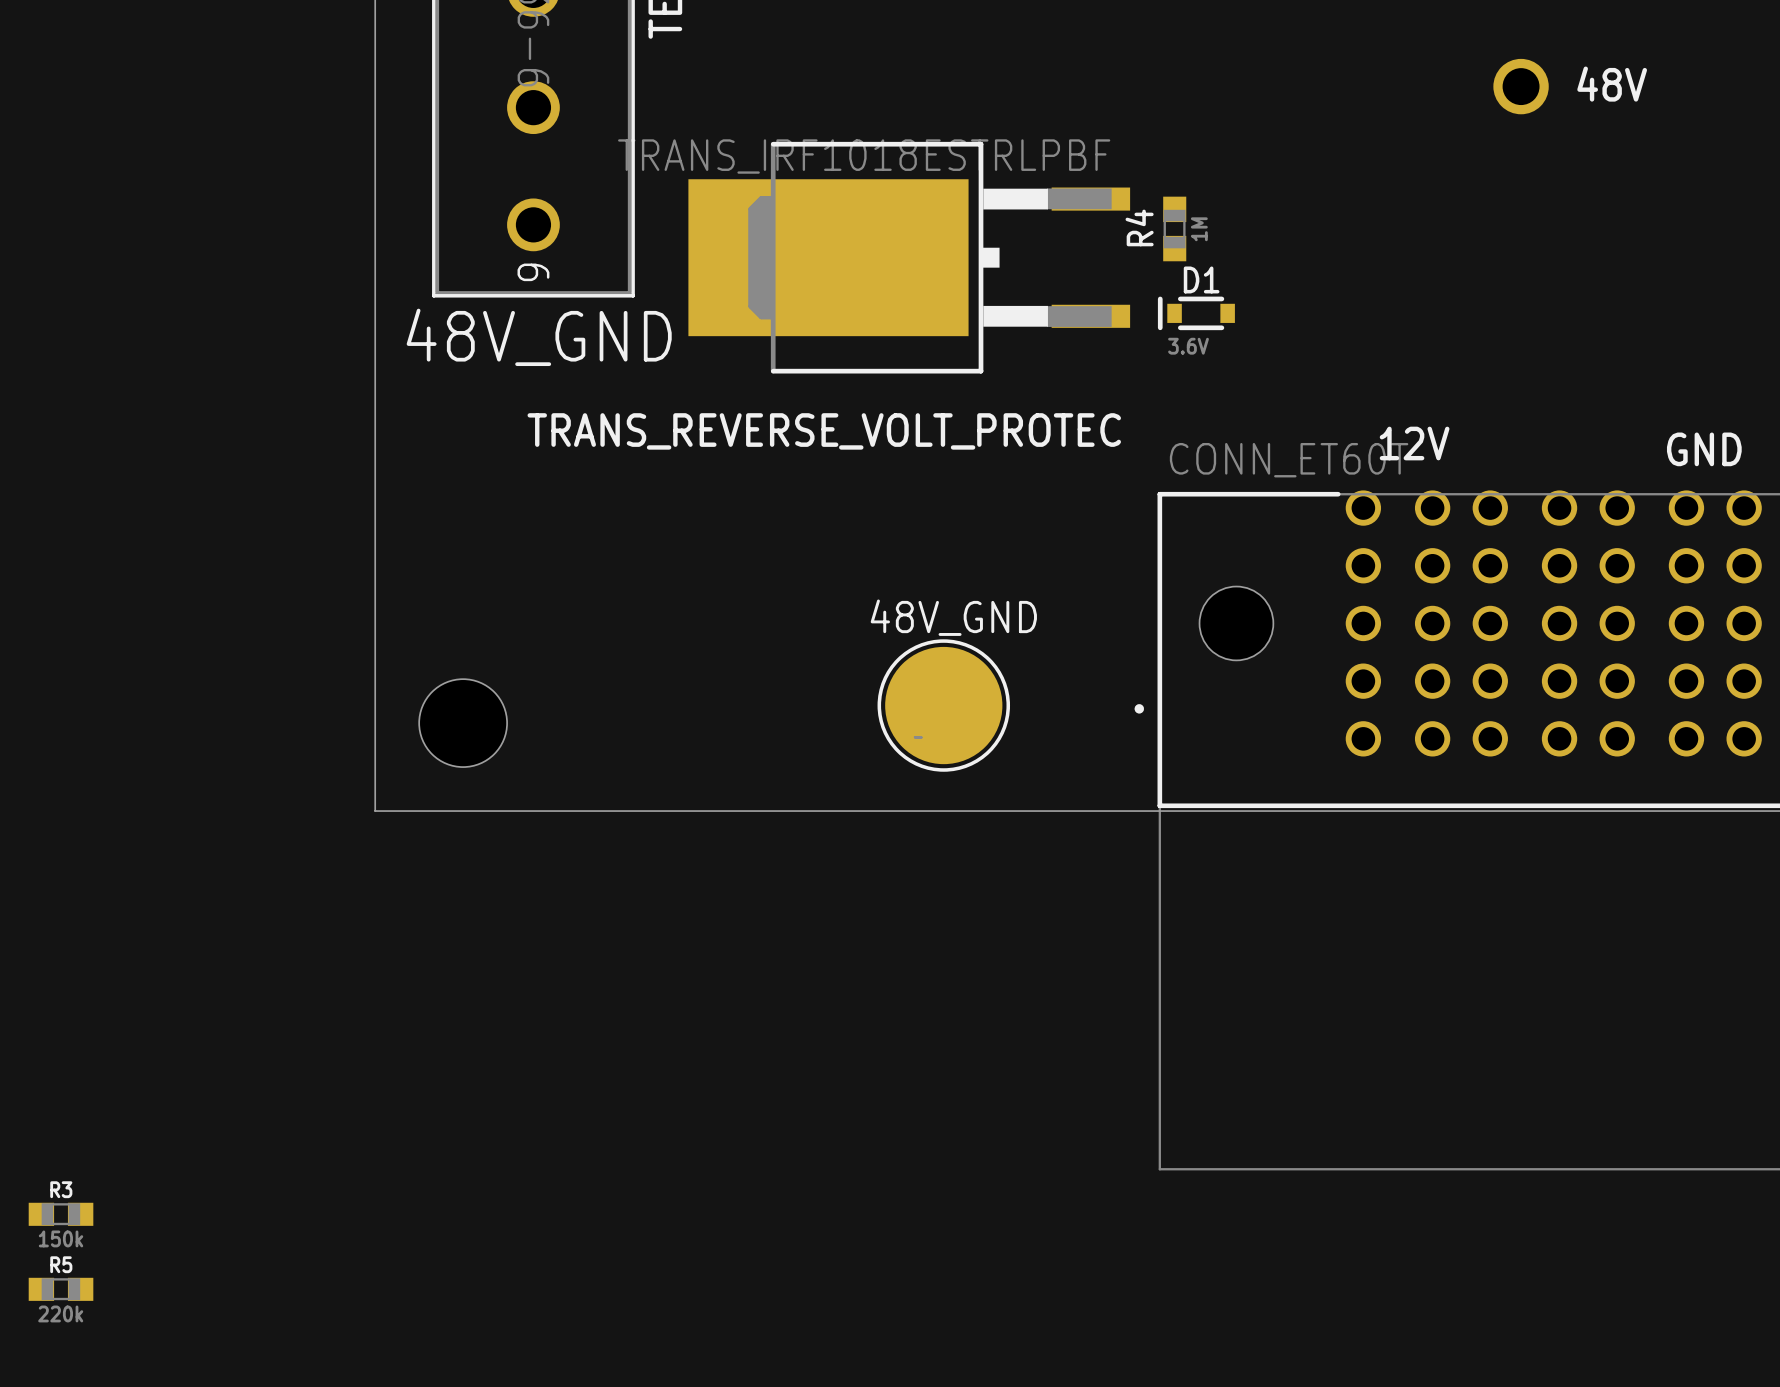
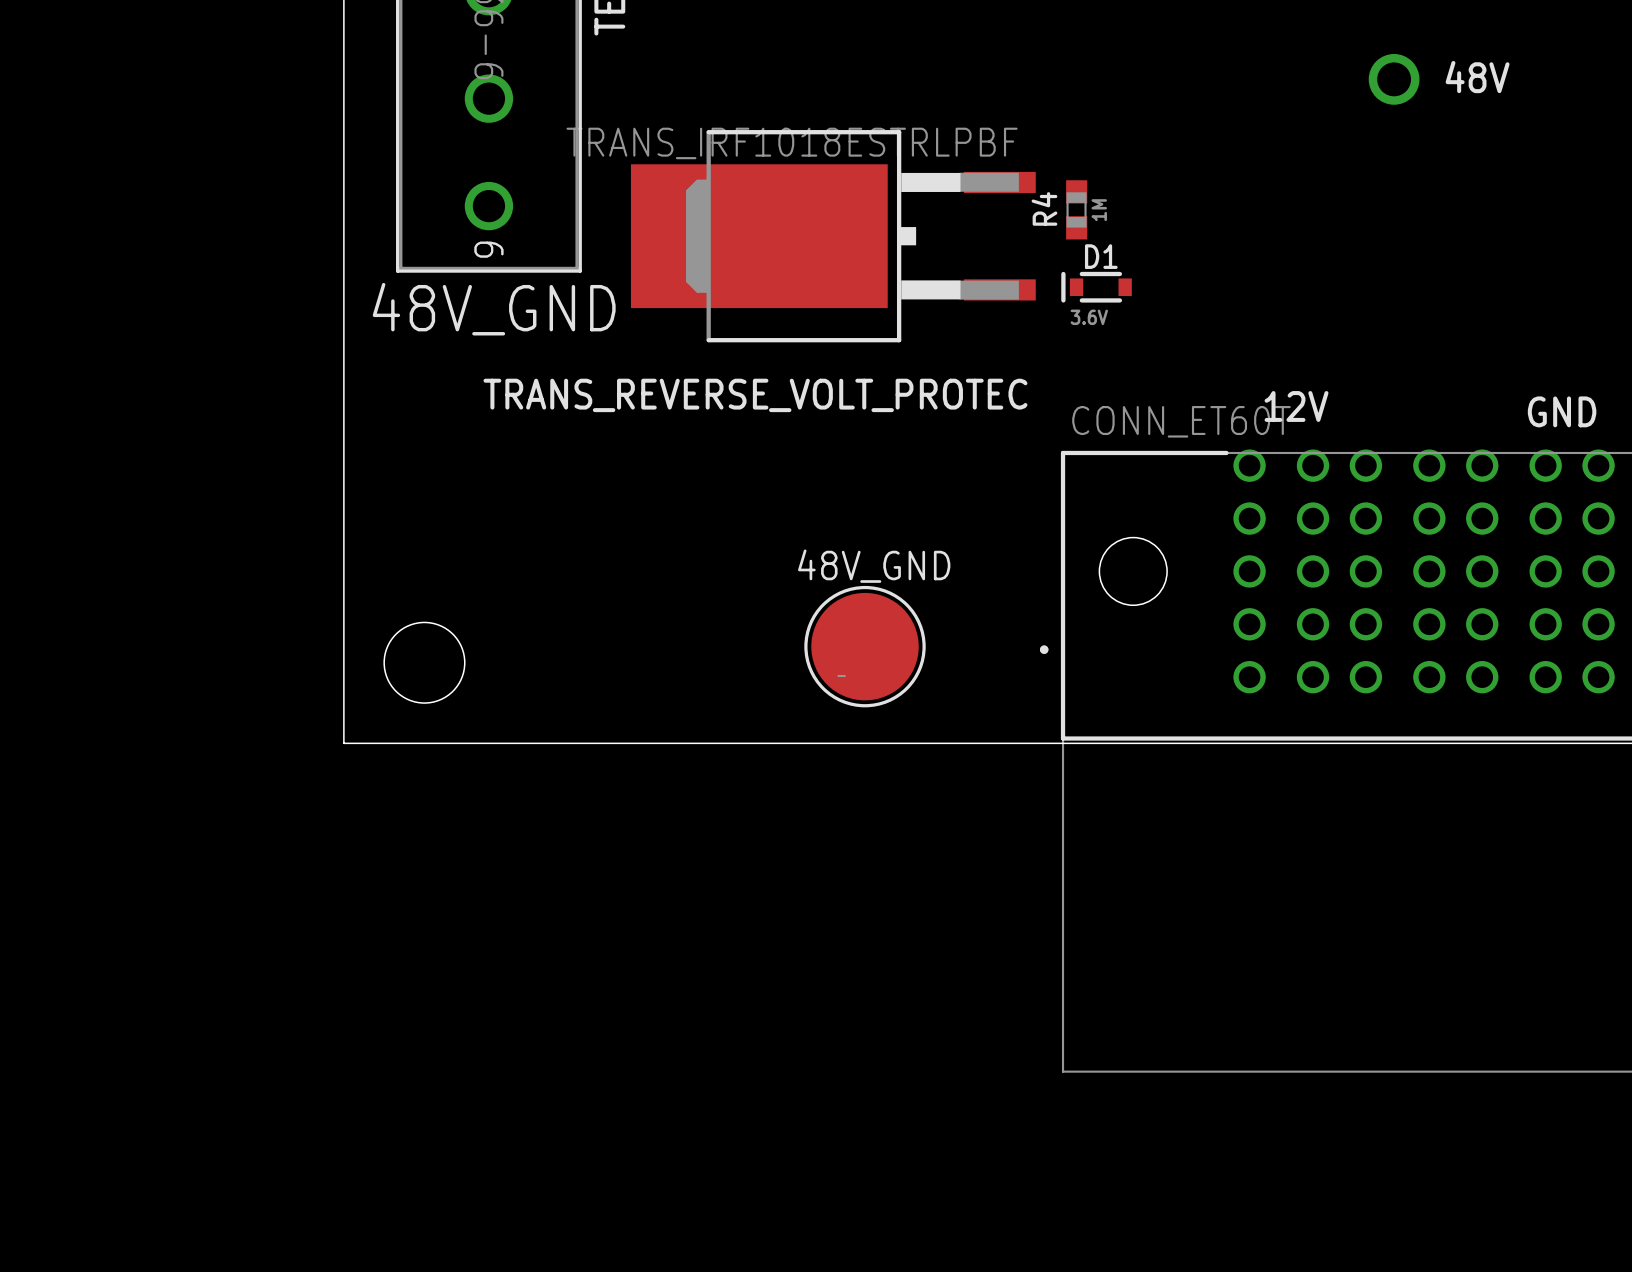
R3: 150k (61, 1214) -> none
R5: 220k (61, 1289) -> none

